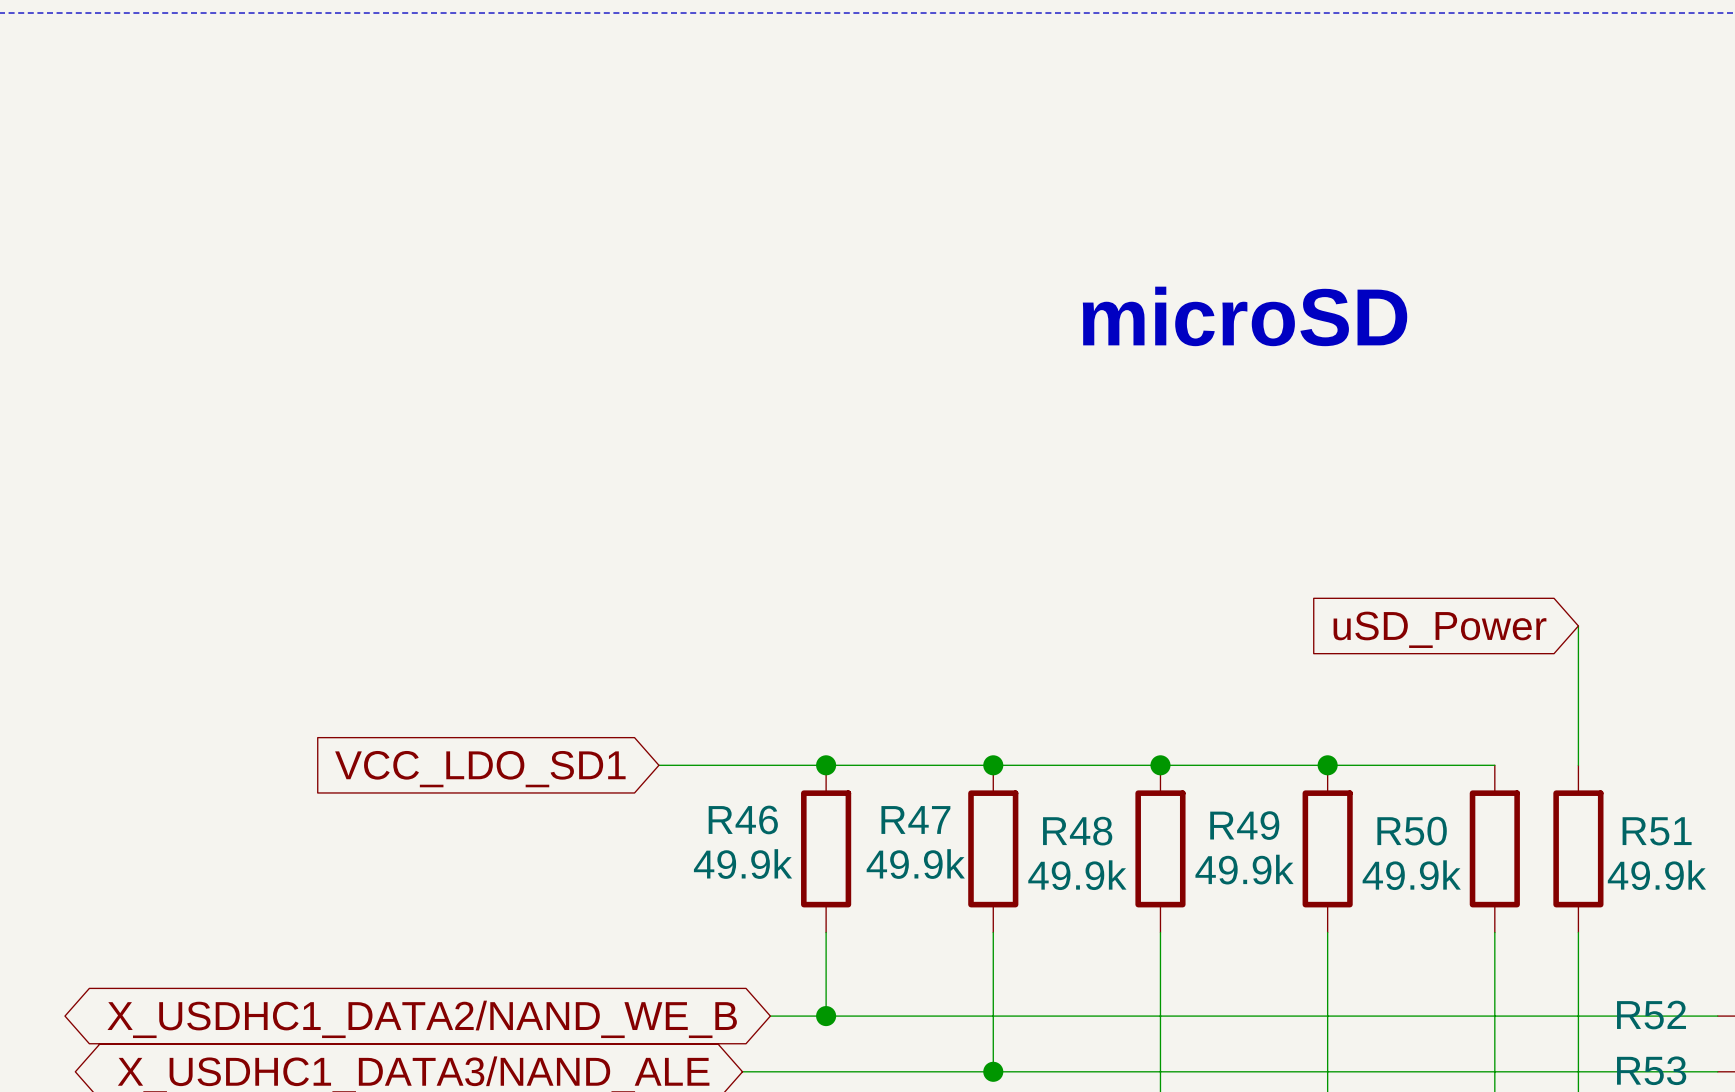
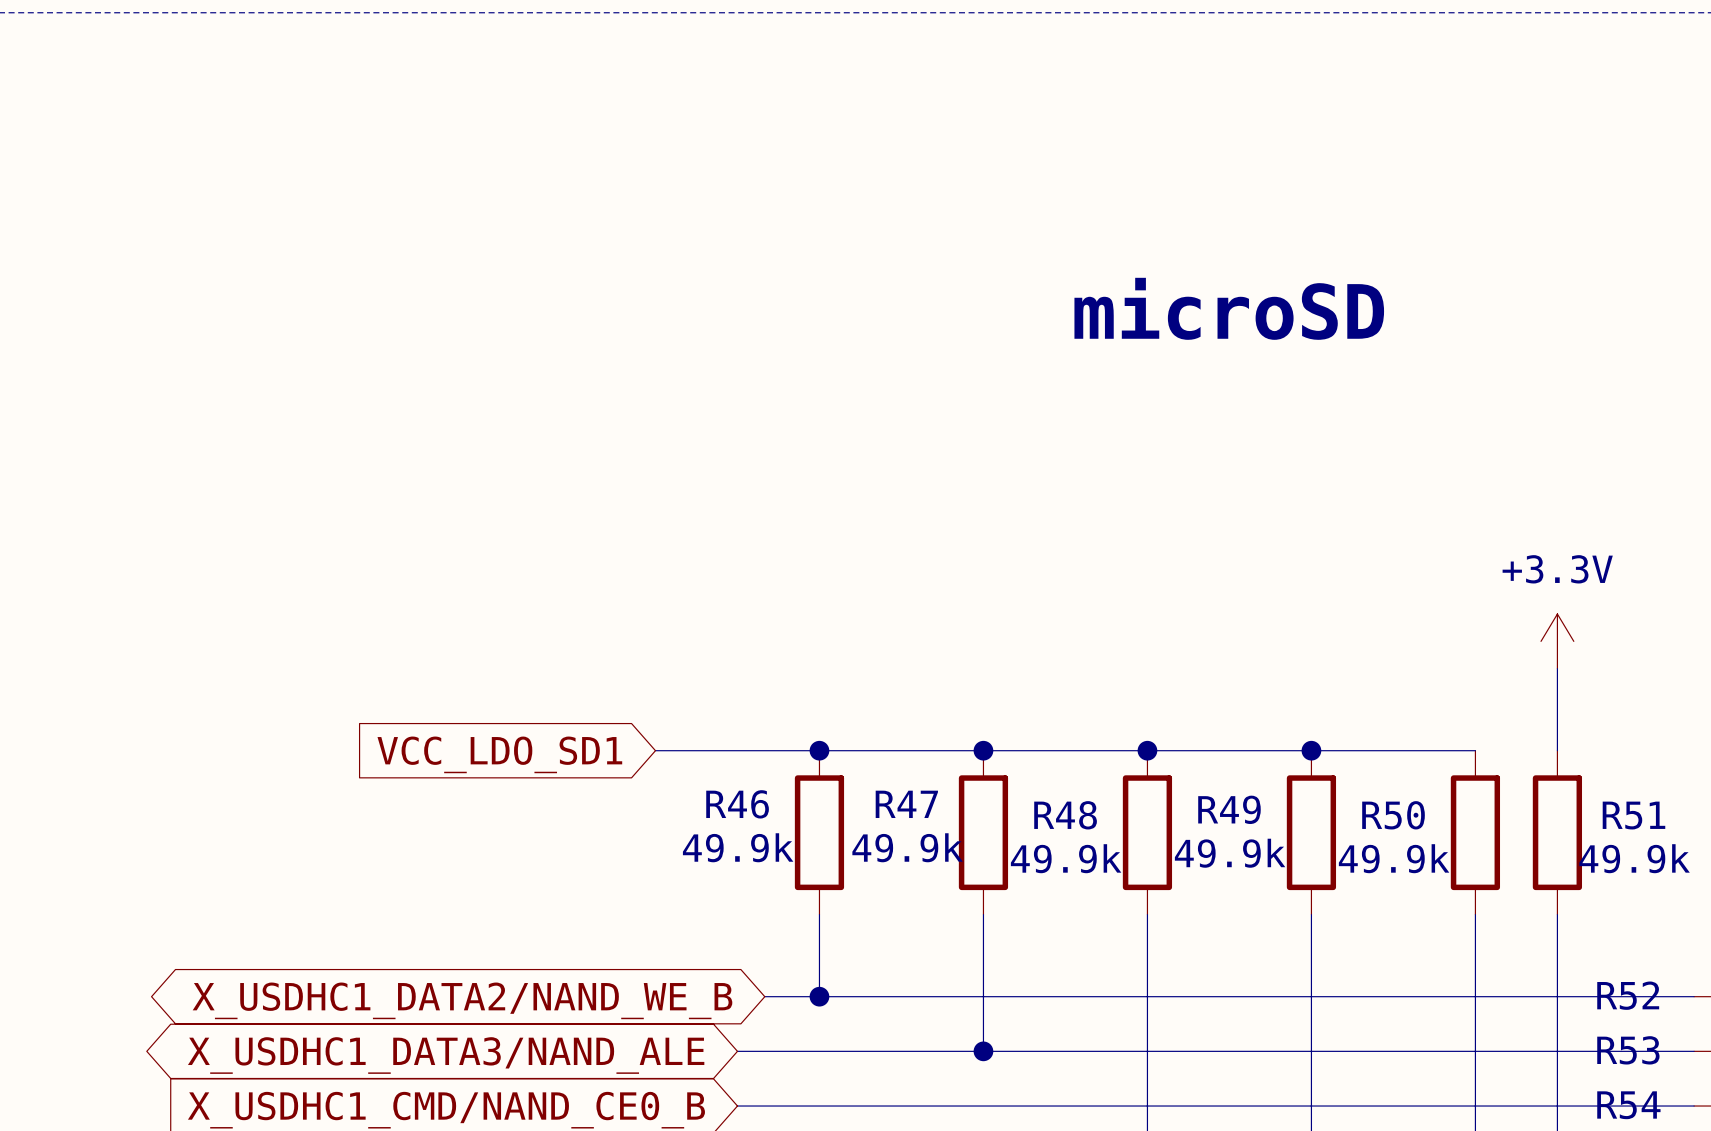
global label: uSD_Power (1439, 629) -> none
power symbol: none -> +3.3V (1557, 641)

